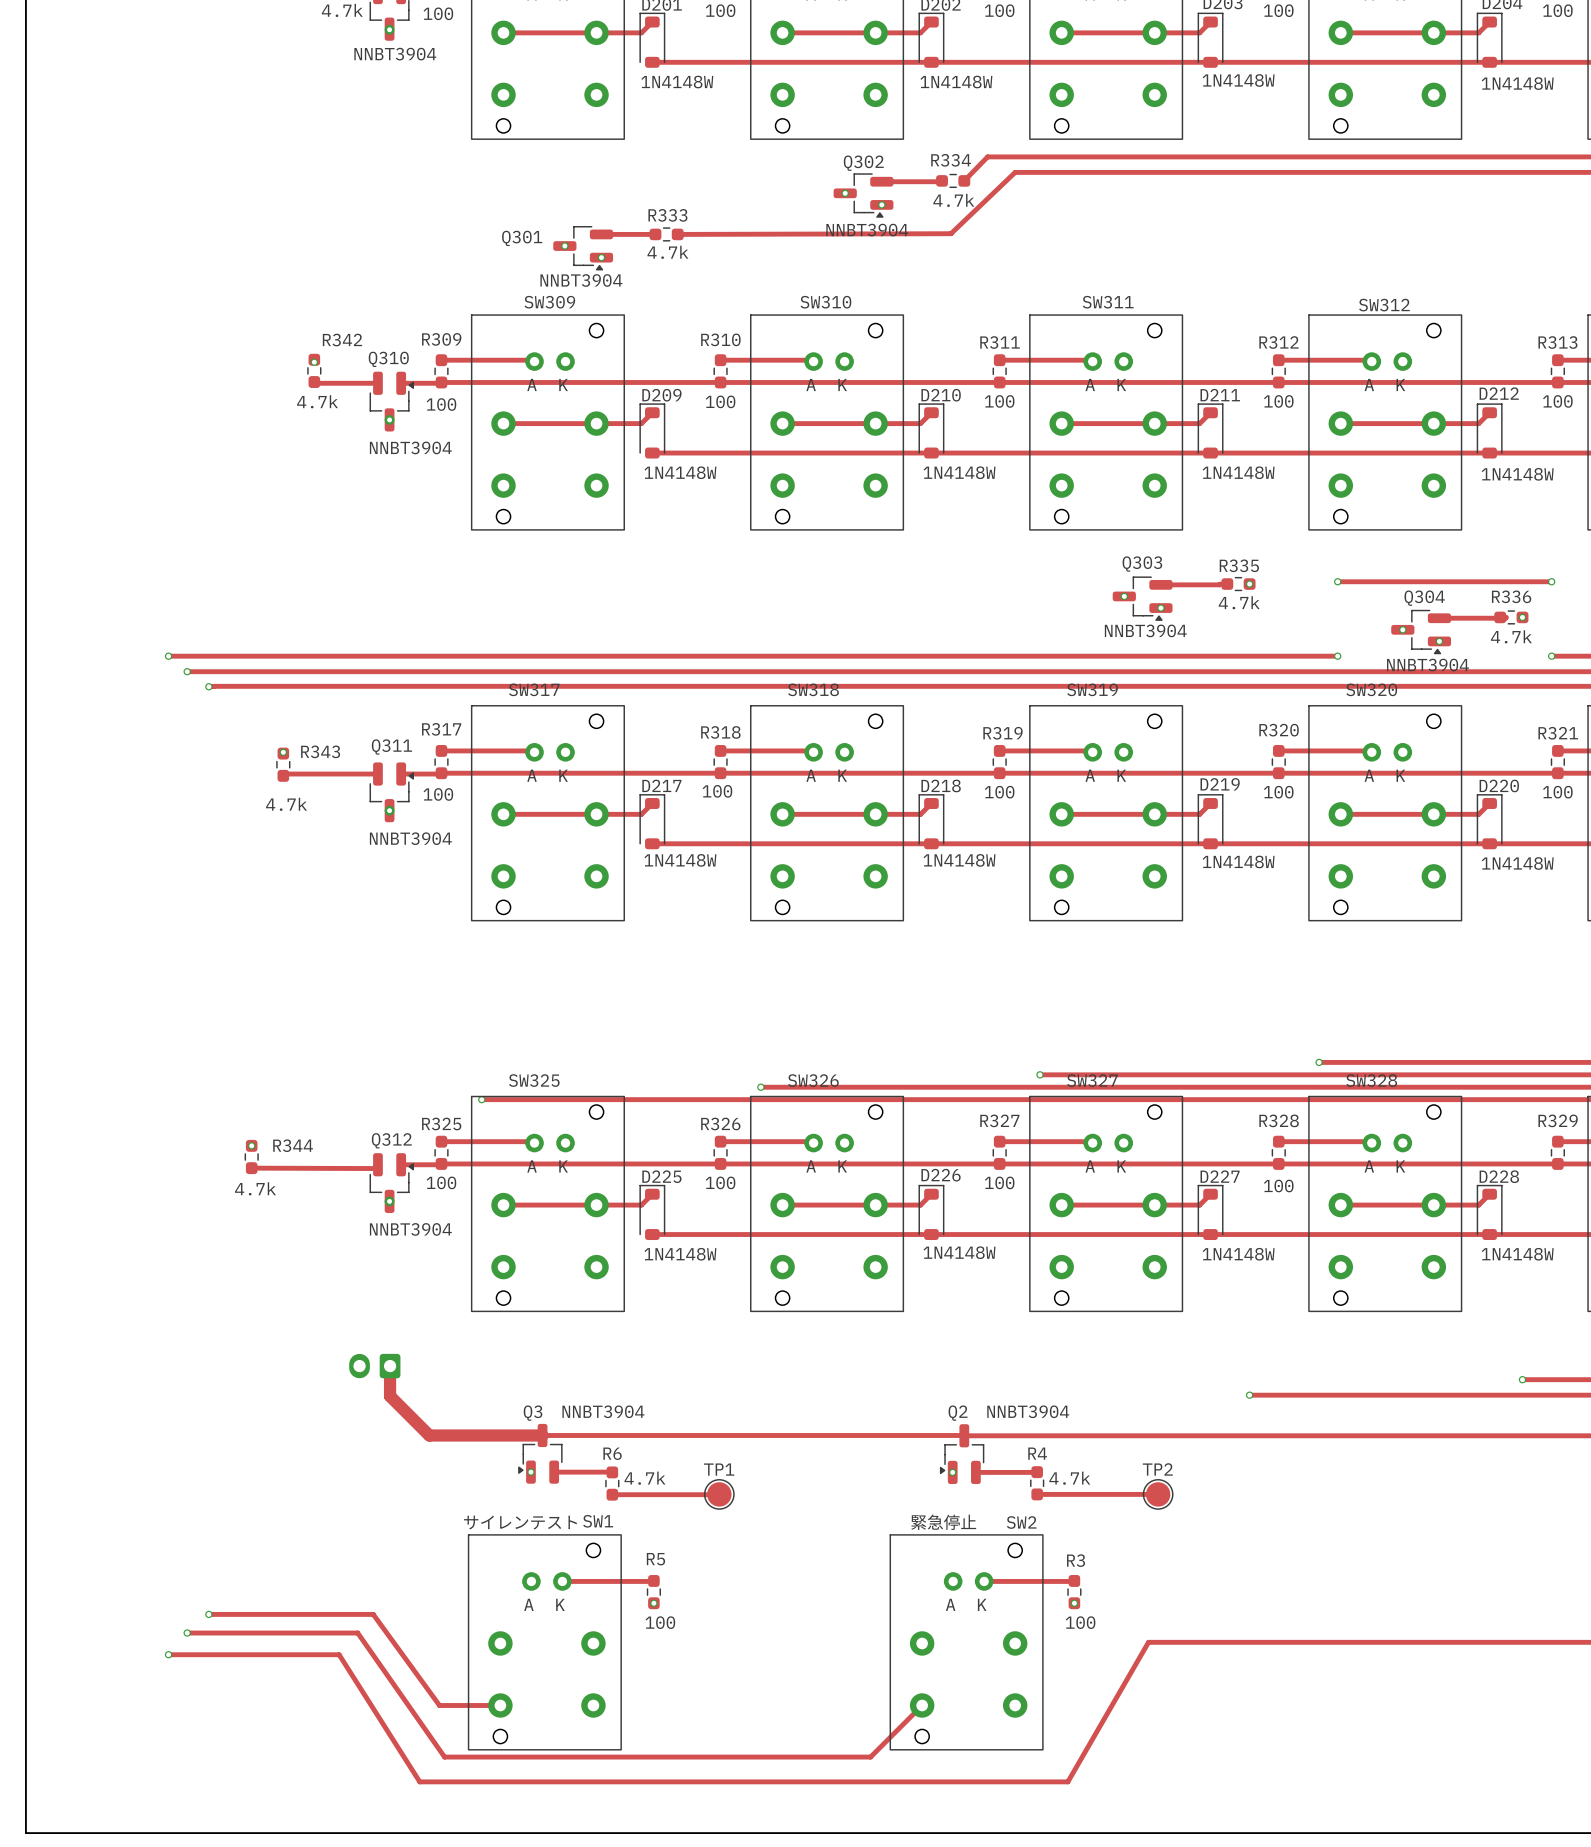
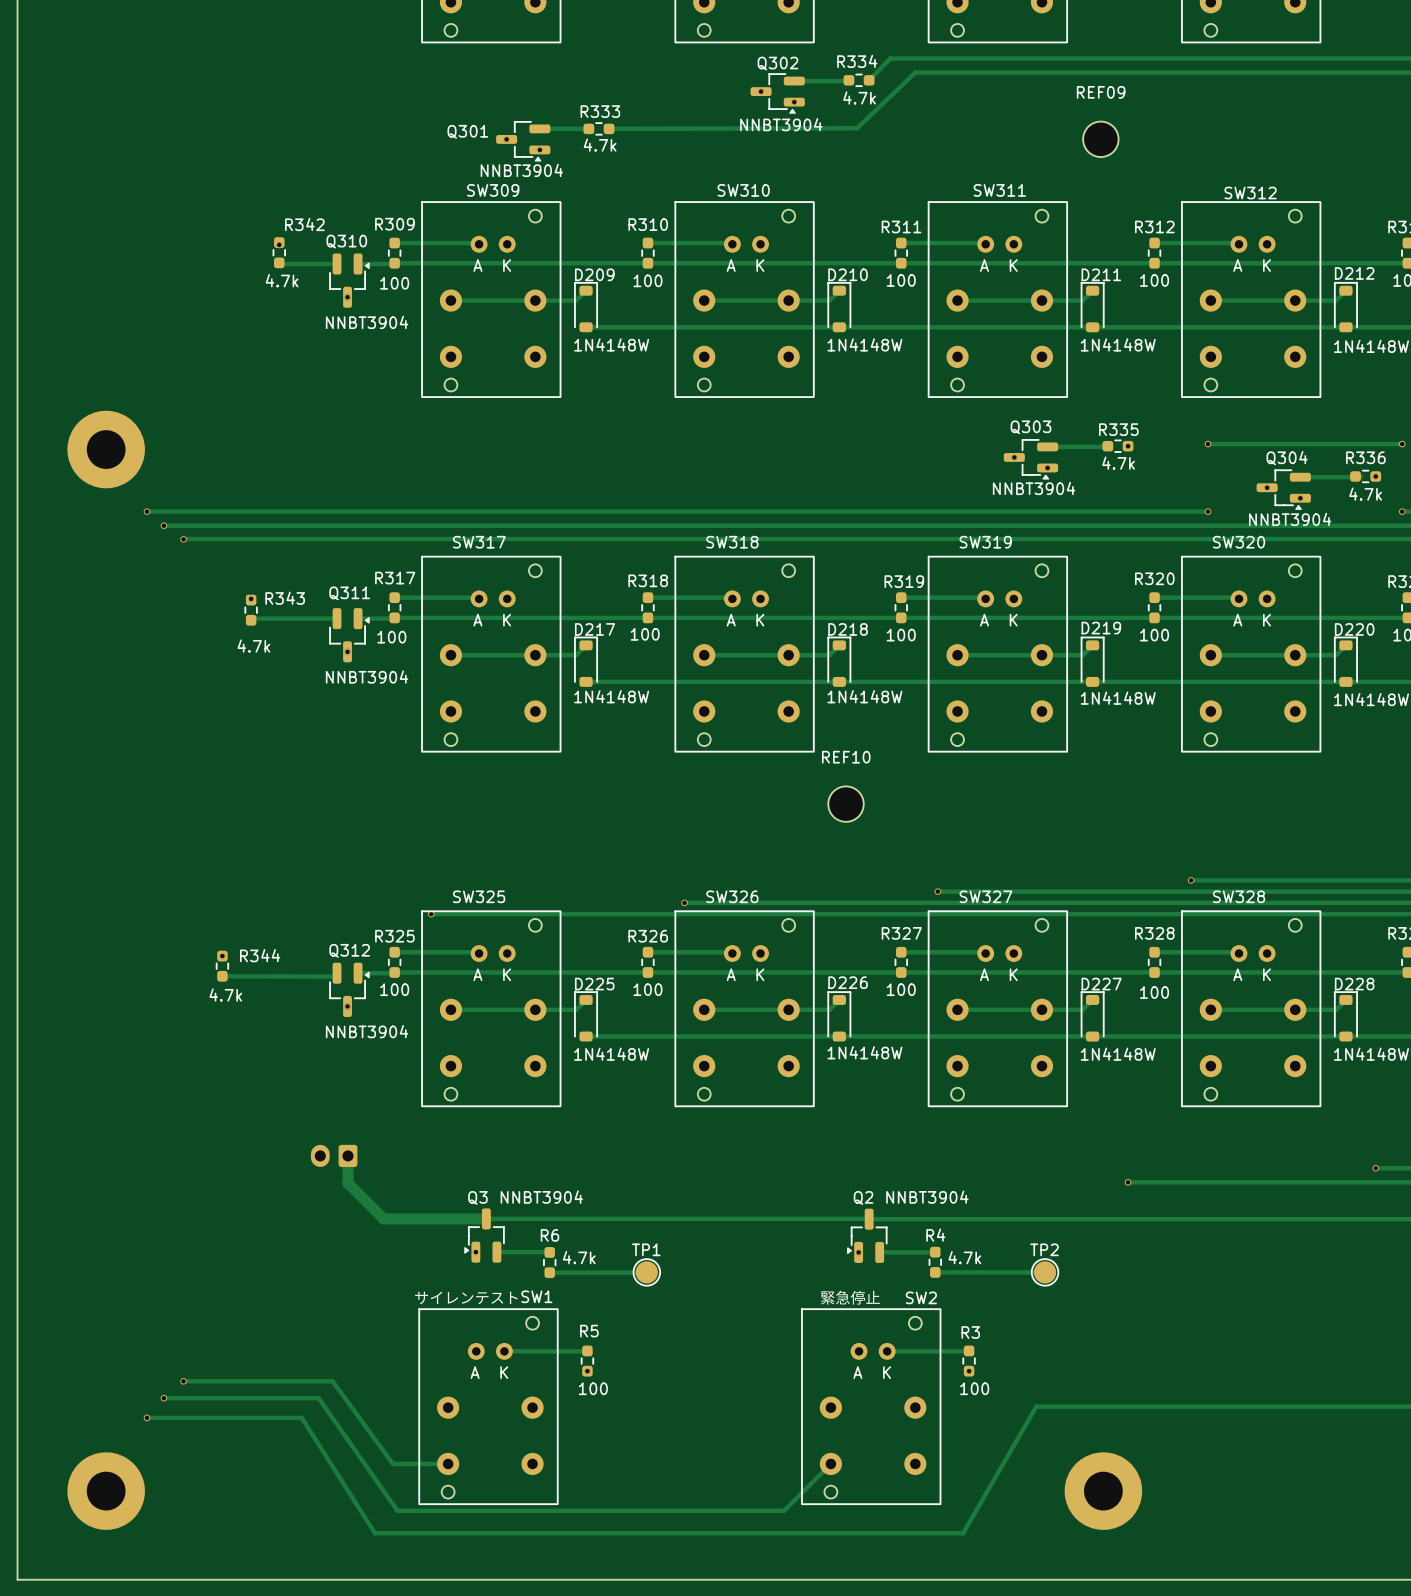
REF09: none -> (1100, 139)
part: none -> (106, 449)
REF10: none -> (846, 804)
part: none -> (106, 1491)
part: none -> (1103, 1491)

